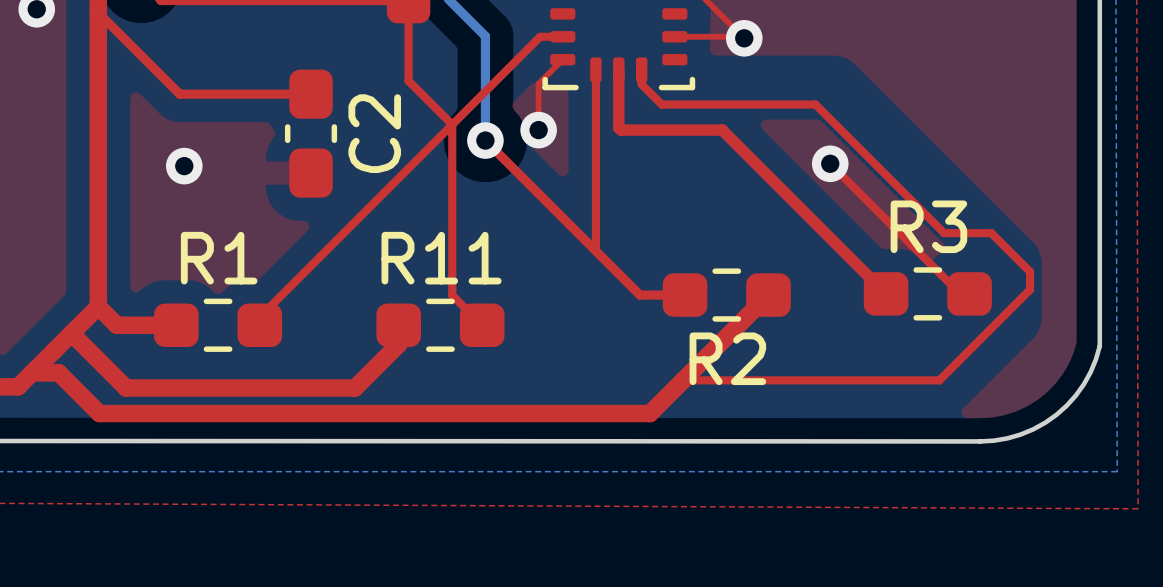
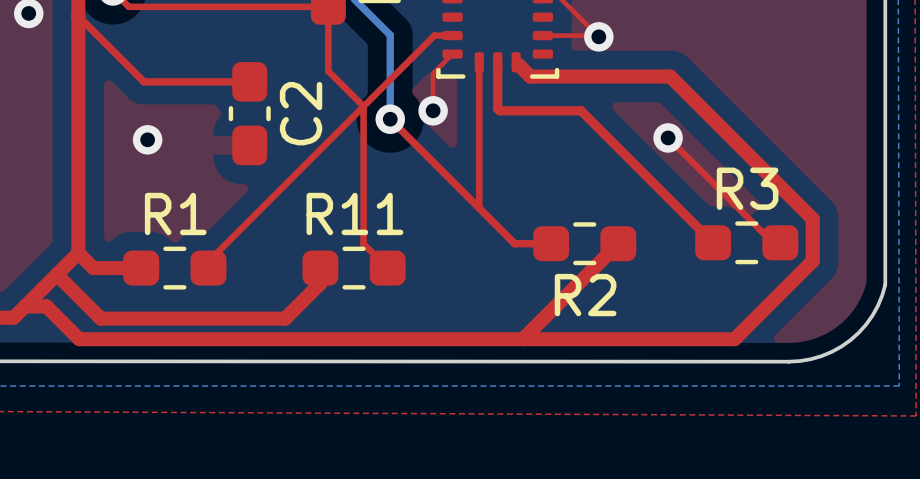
top track: (641, 69) (641, 84) (661, 104) (815, 104) (944, 233) (991, 233) (1030, 271) (1030, 289) (939, 380) (683, 380) -> none
top track: none -> (518, 64) (530, 76) (670, 76) (812, 218) (812, 261) (734, 339) (522, 339)

